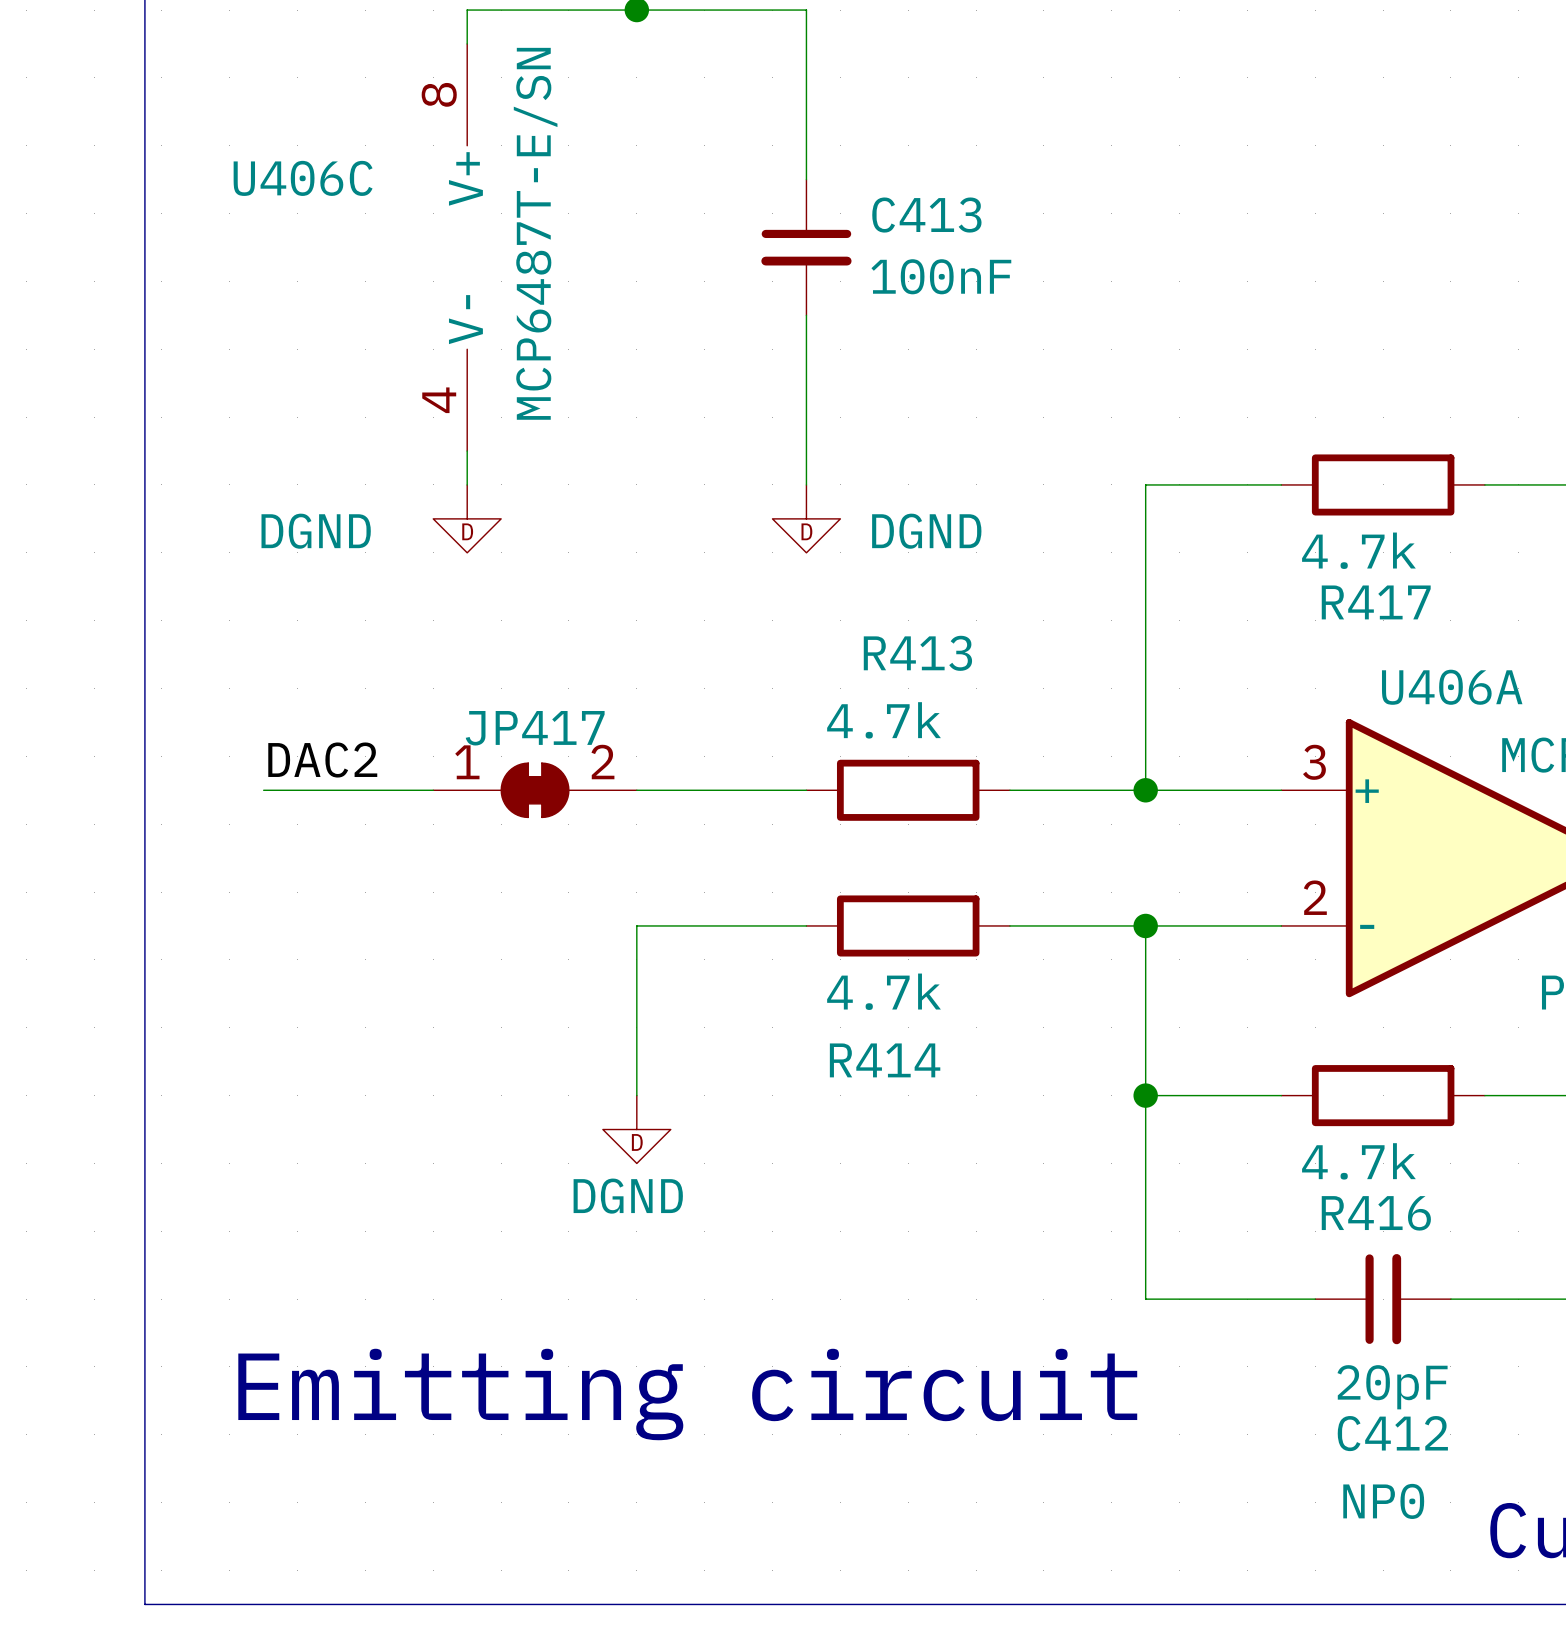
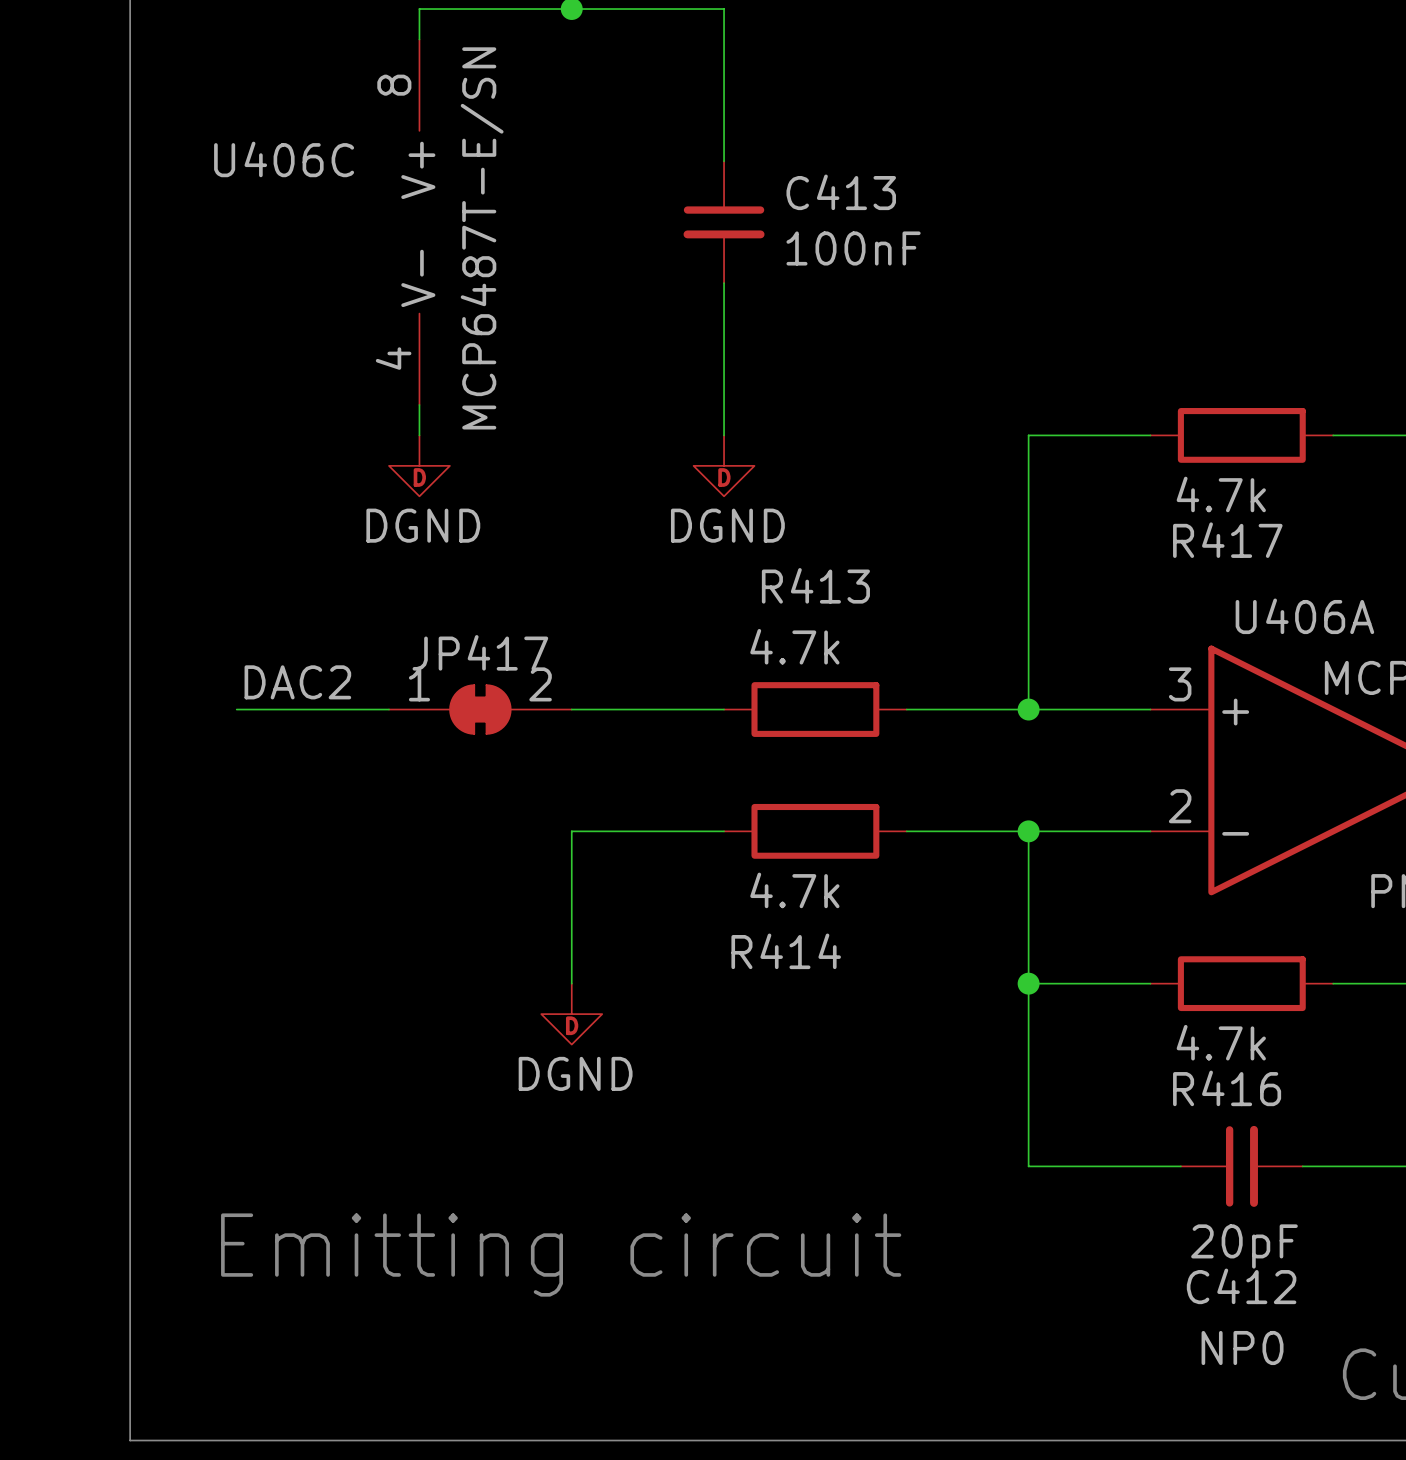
power symbol text position: DGND (316, 531) -> DGND (423, 525)
power symbol text position: DGND (926, 531) -> DGND (727, 525)

